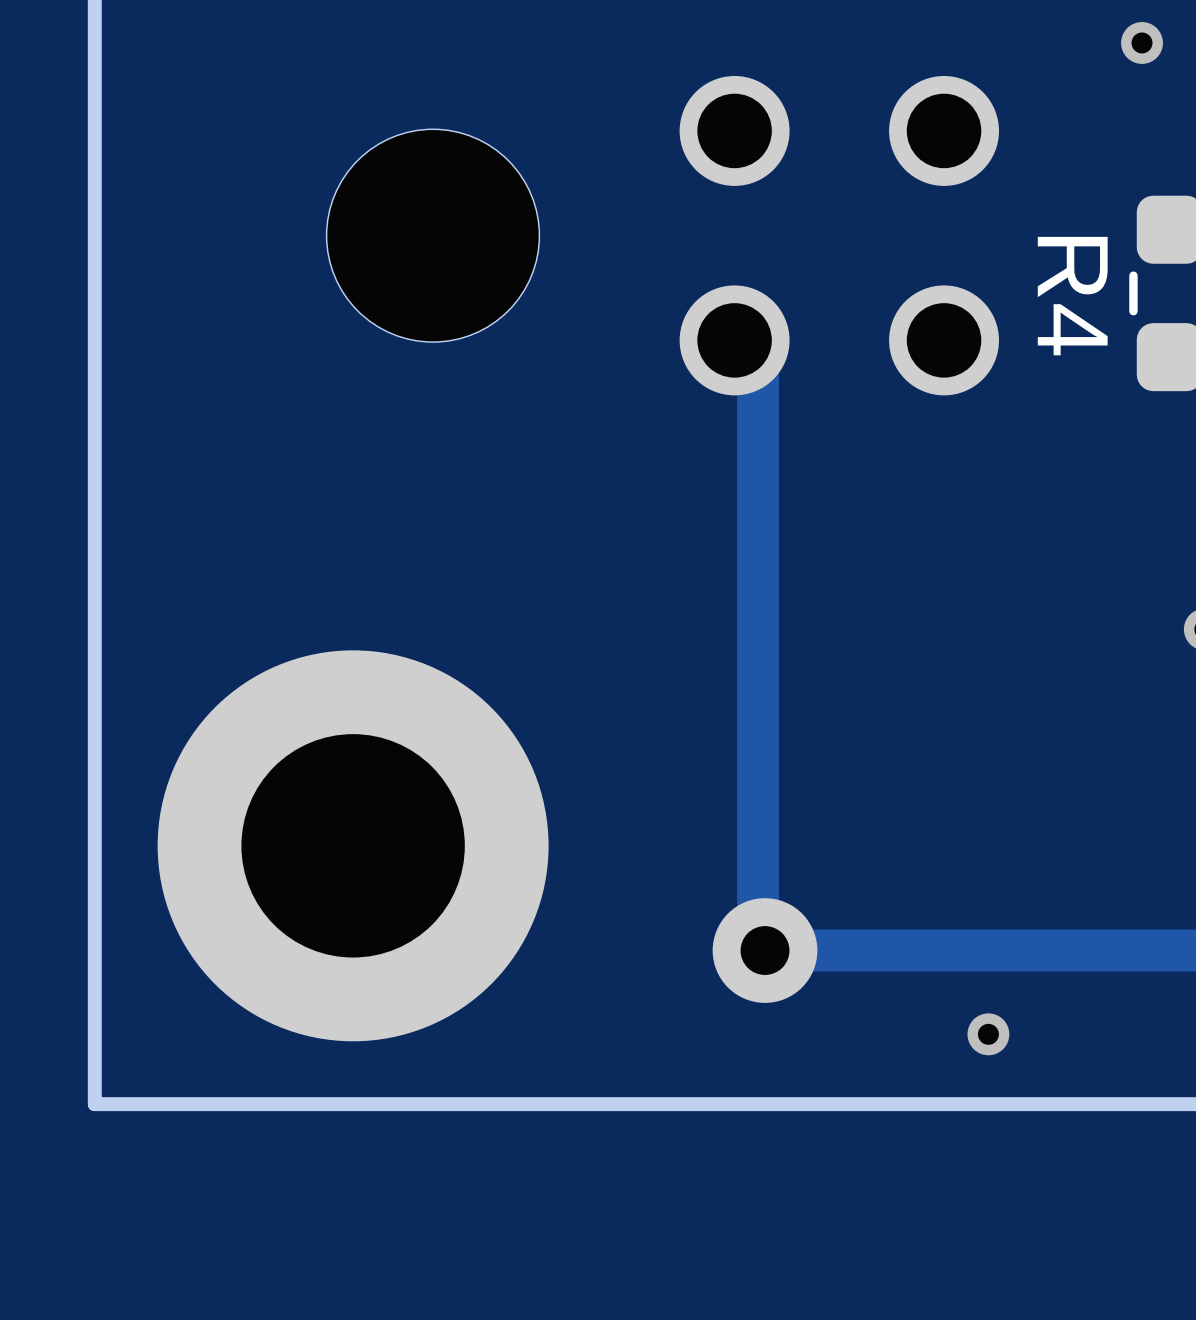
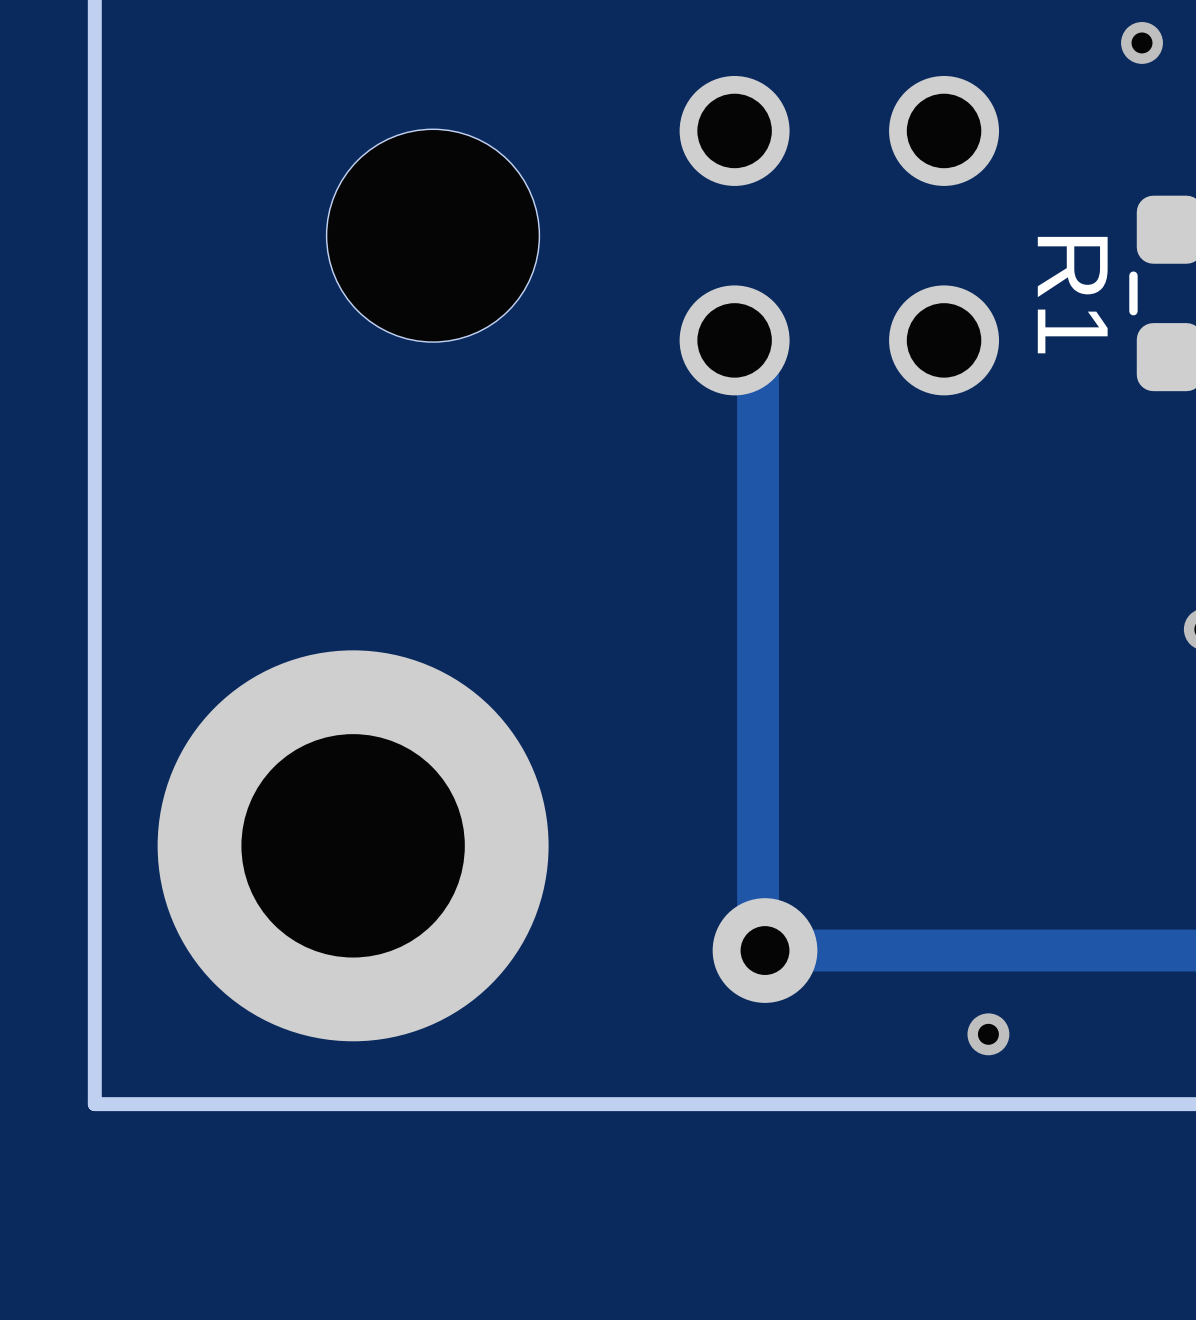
R4 name: R4 (1072, 296) -> R1 (1072, 295)

